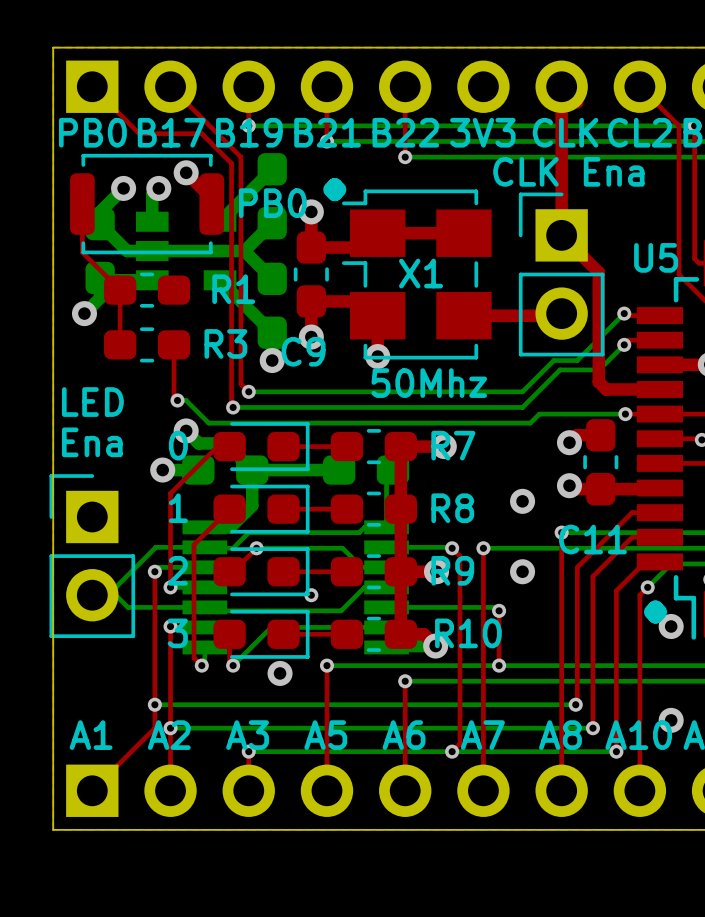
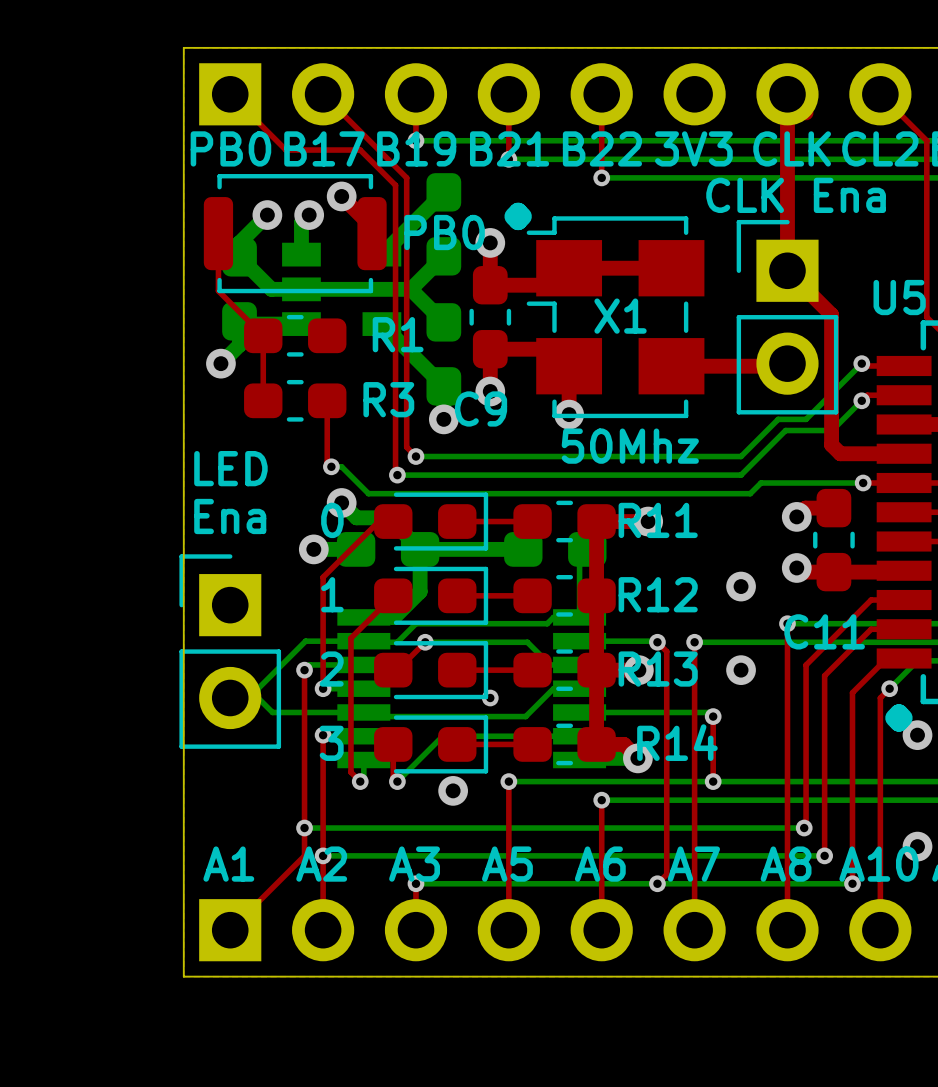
R7 name: R7 (453, 445) -> R11 (658, 520)
R8 name: R8 (452, 508) -> R12 (658, 594)
R9 name: R9 (452, 570) -> R13 (658, 669)
R10 name: R10 (468, 633) -> R14 (677, 742)

